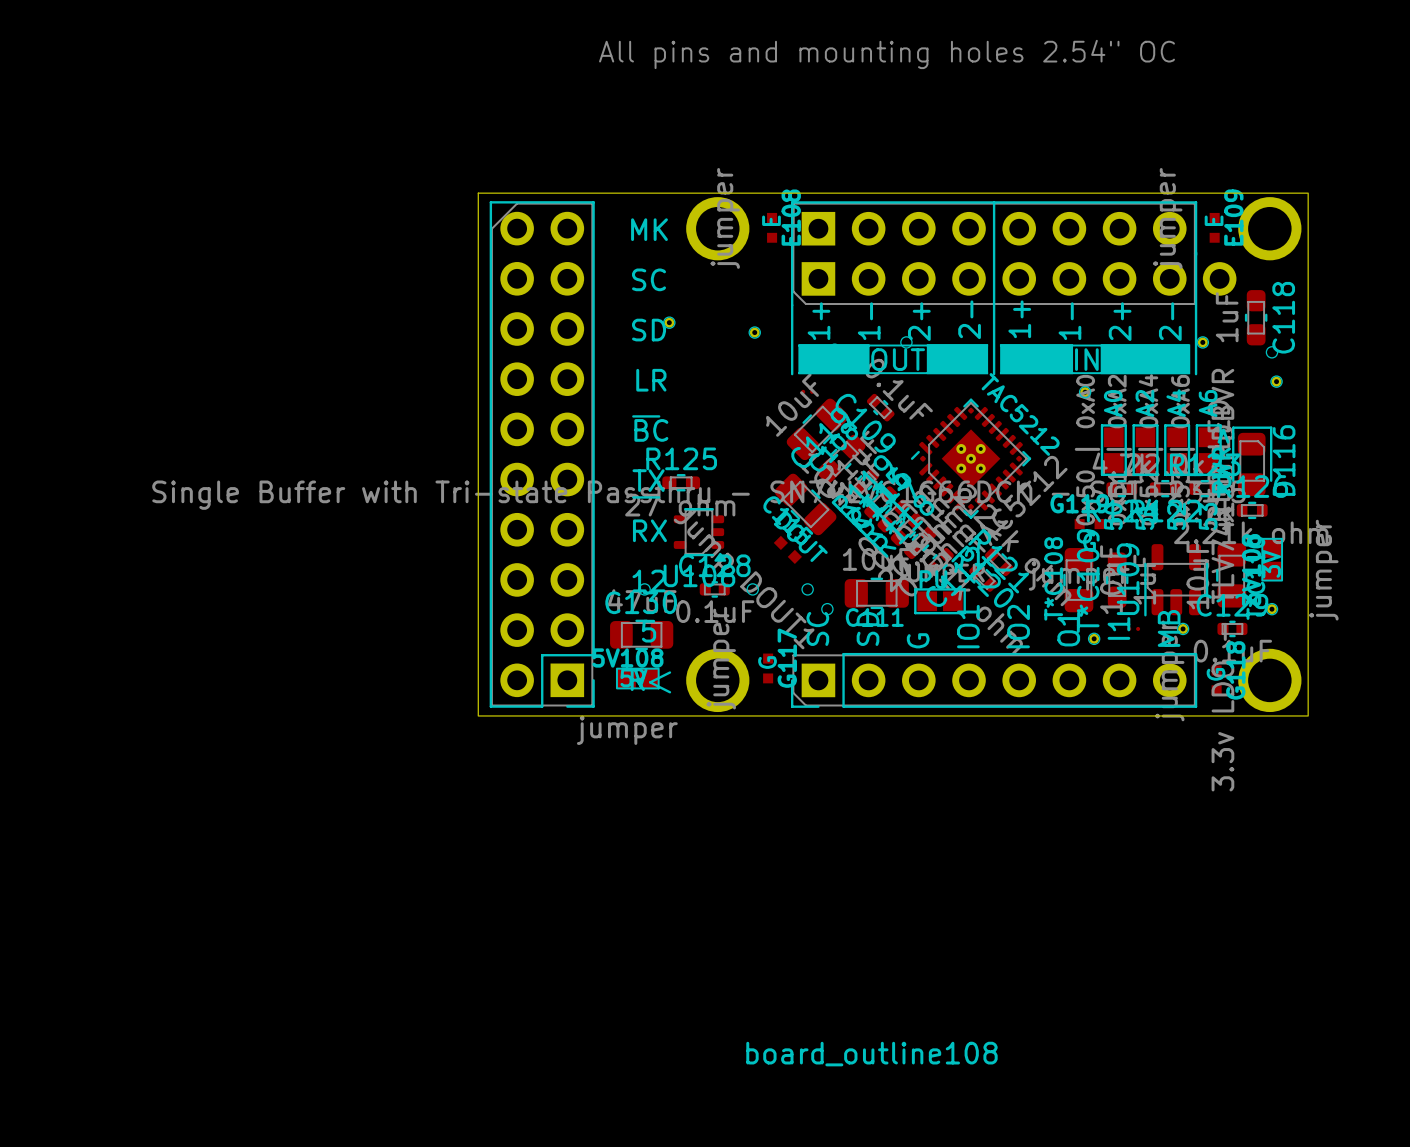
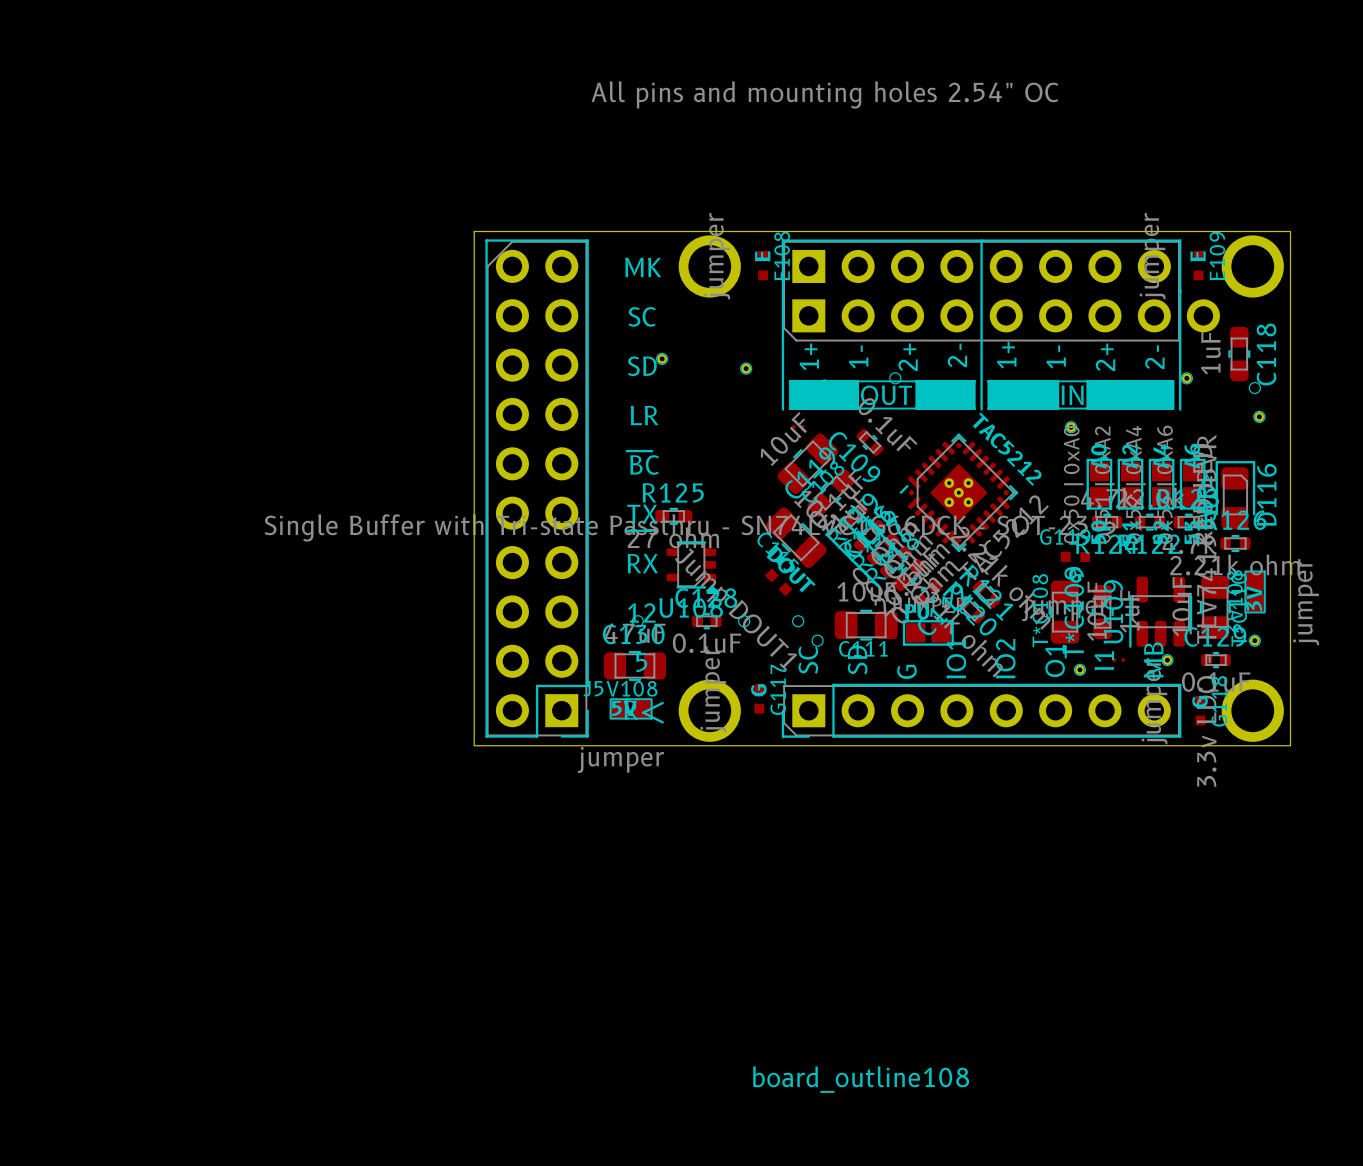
5V108 name: 5V108 (627, 657) -> J5V108 (620, 688)

